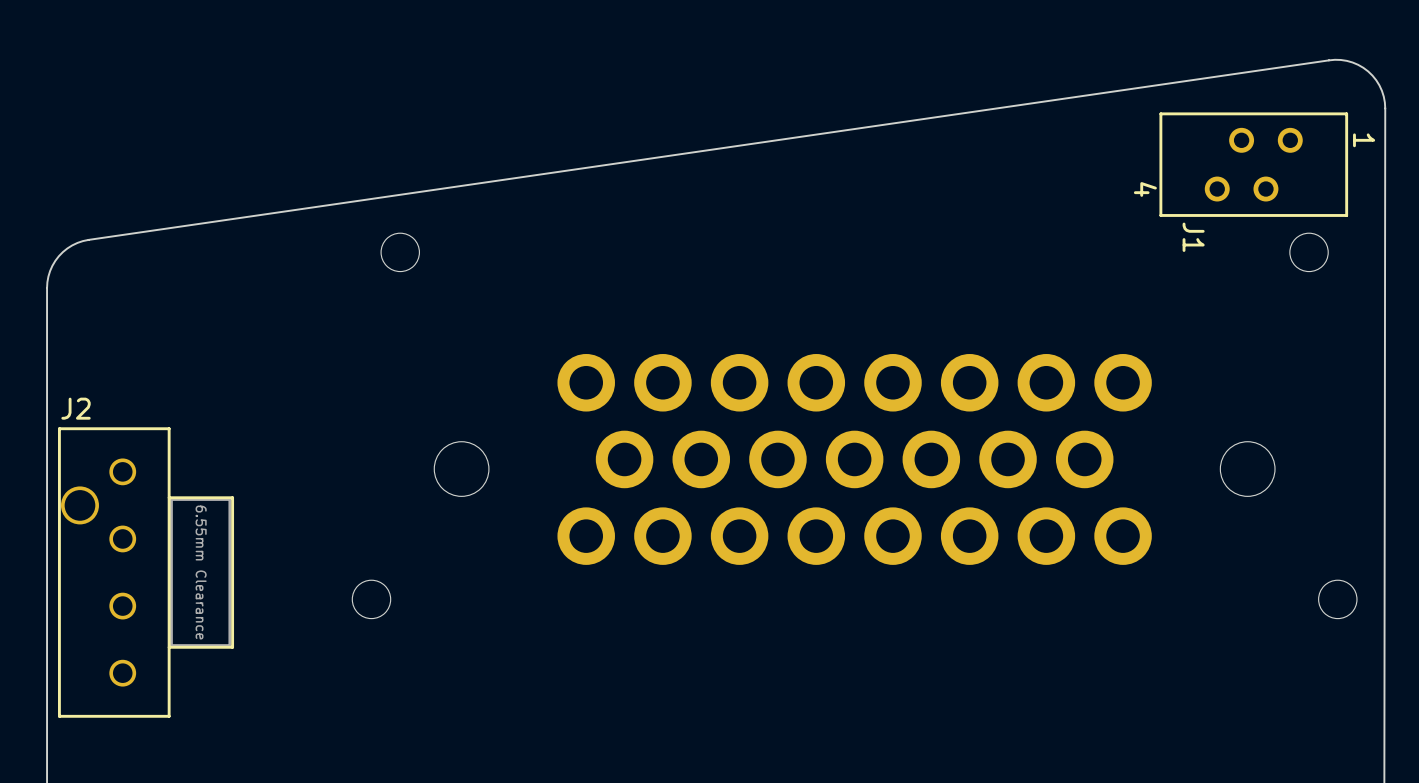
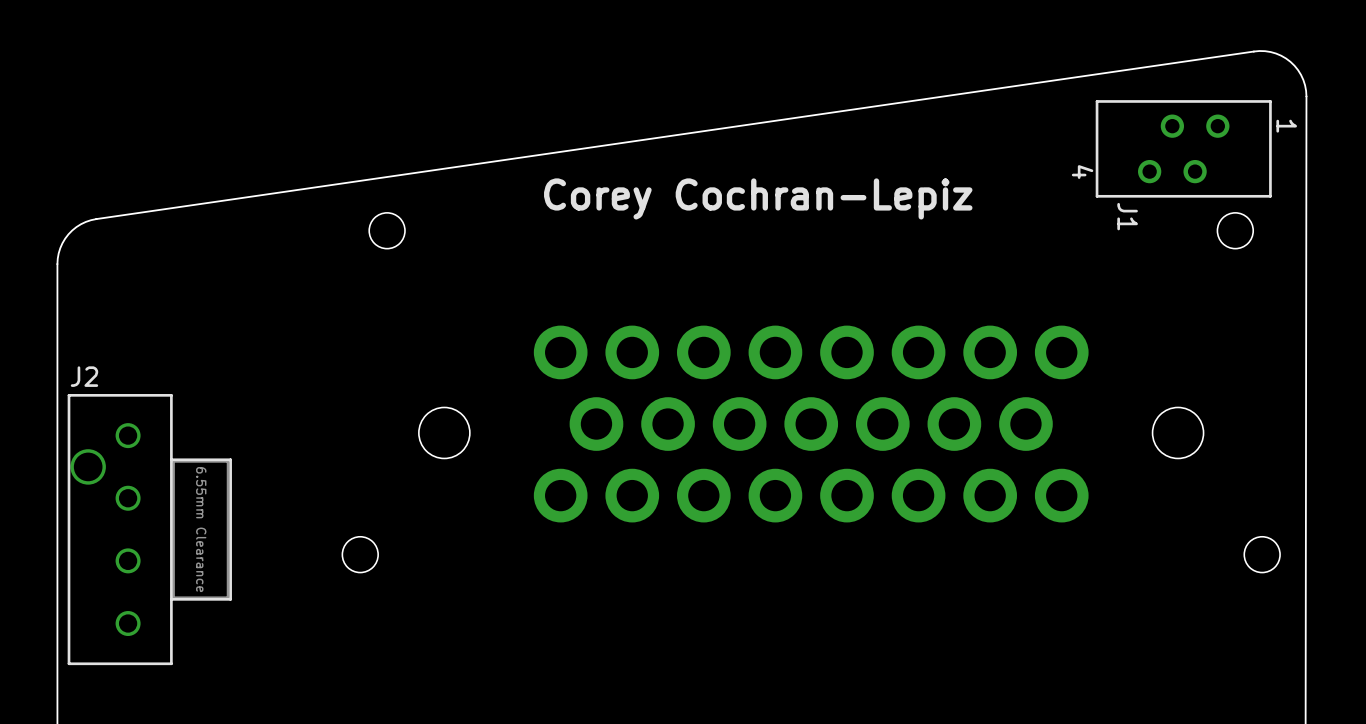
text: none -> Corey Cochran-Lepiz (758, 198)

